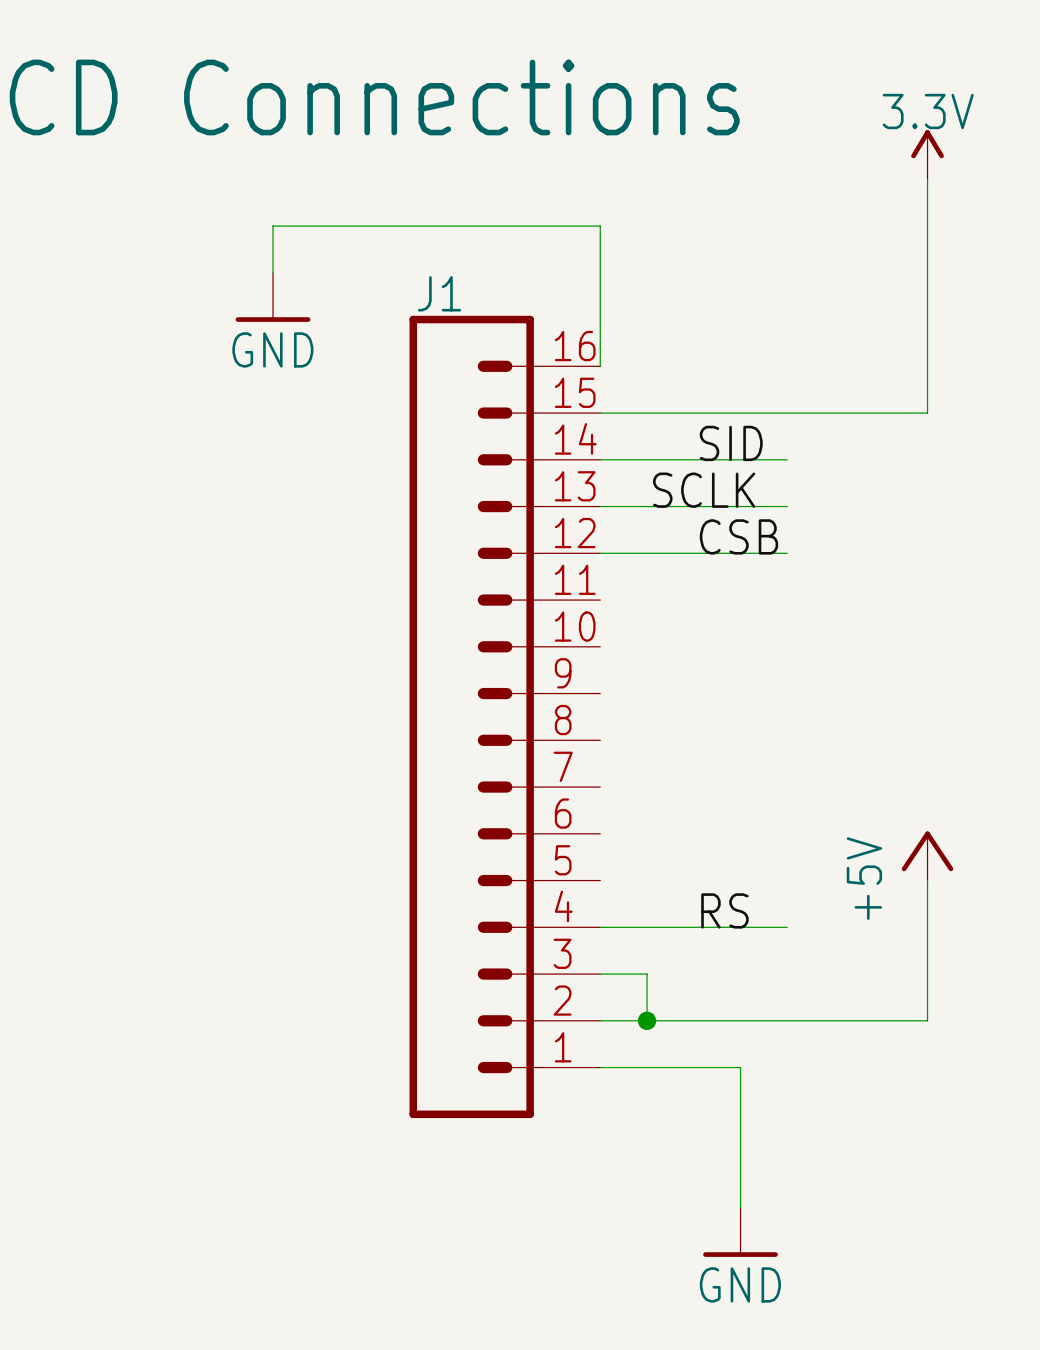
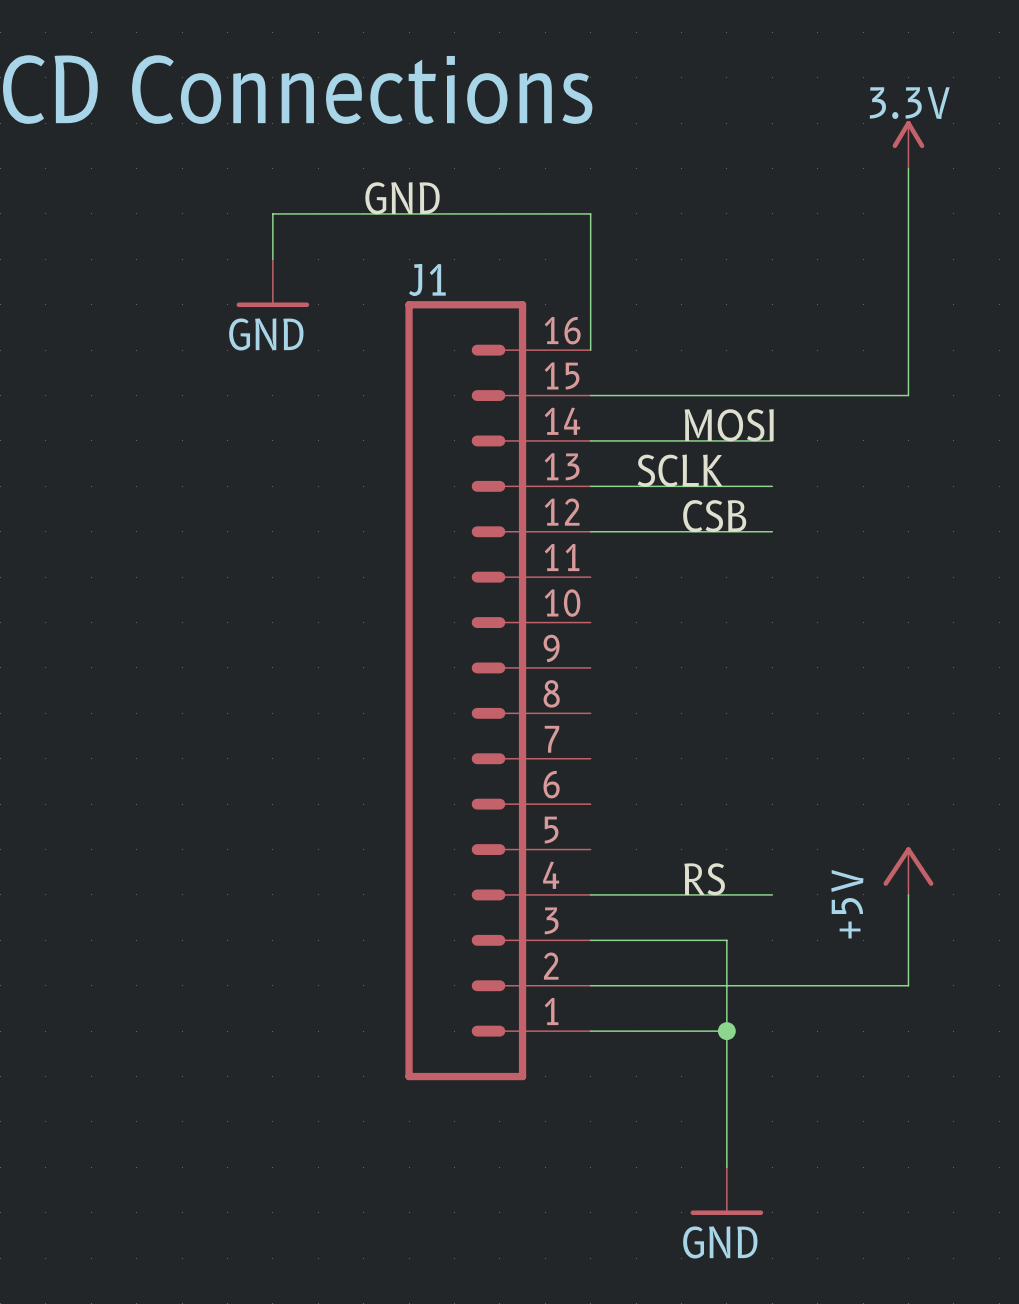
label: none -> GND (402, 198)
label: SID (731, 443) -> MOSI (729, 425)
power symbol position: +5V (927, 856) -> +5V (908, 871)
wire: (647, 974) (647, 1020) -> (636, 940) (726, 940) (726, 1031)
junction position: (647, 1020) -> (726, 1031)

